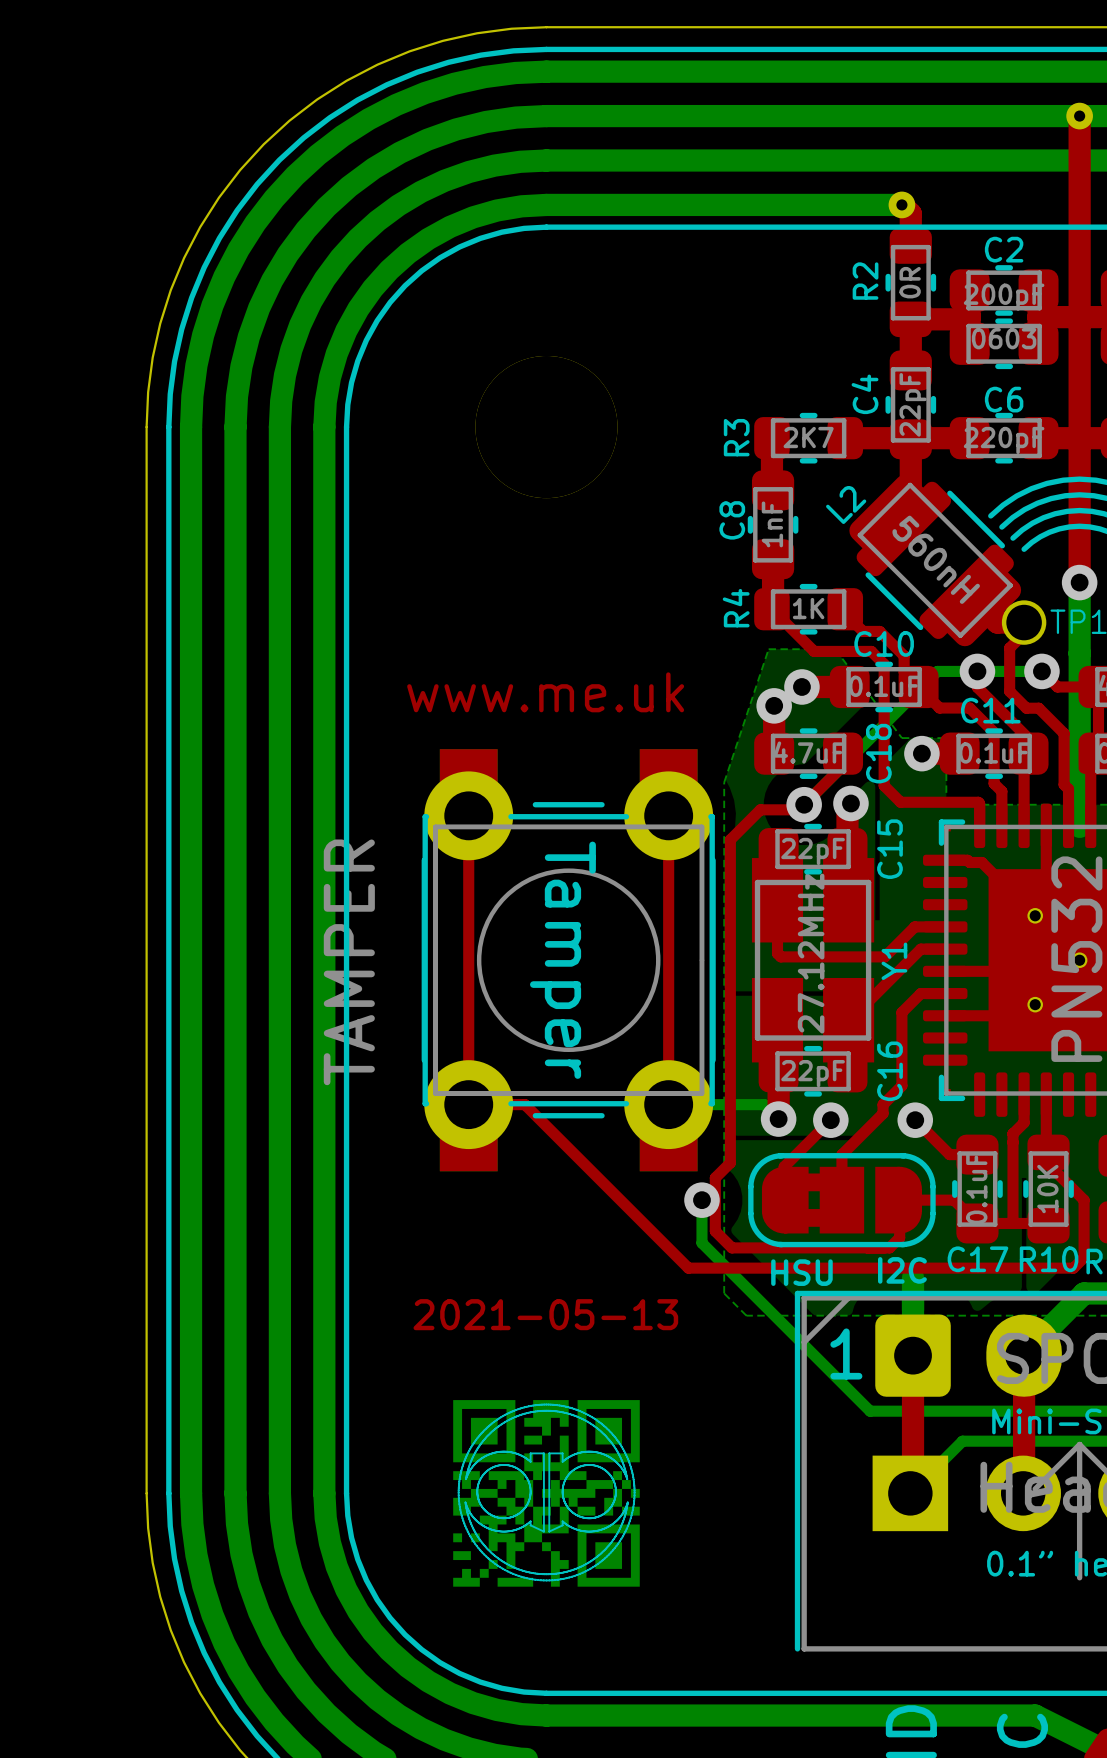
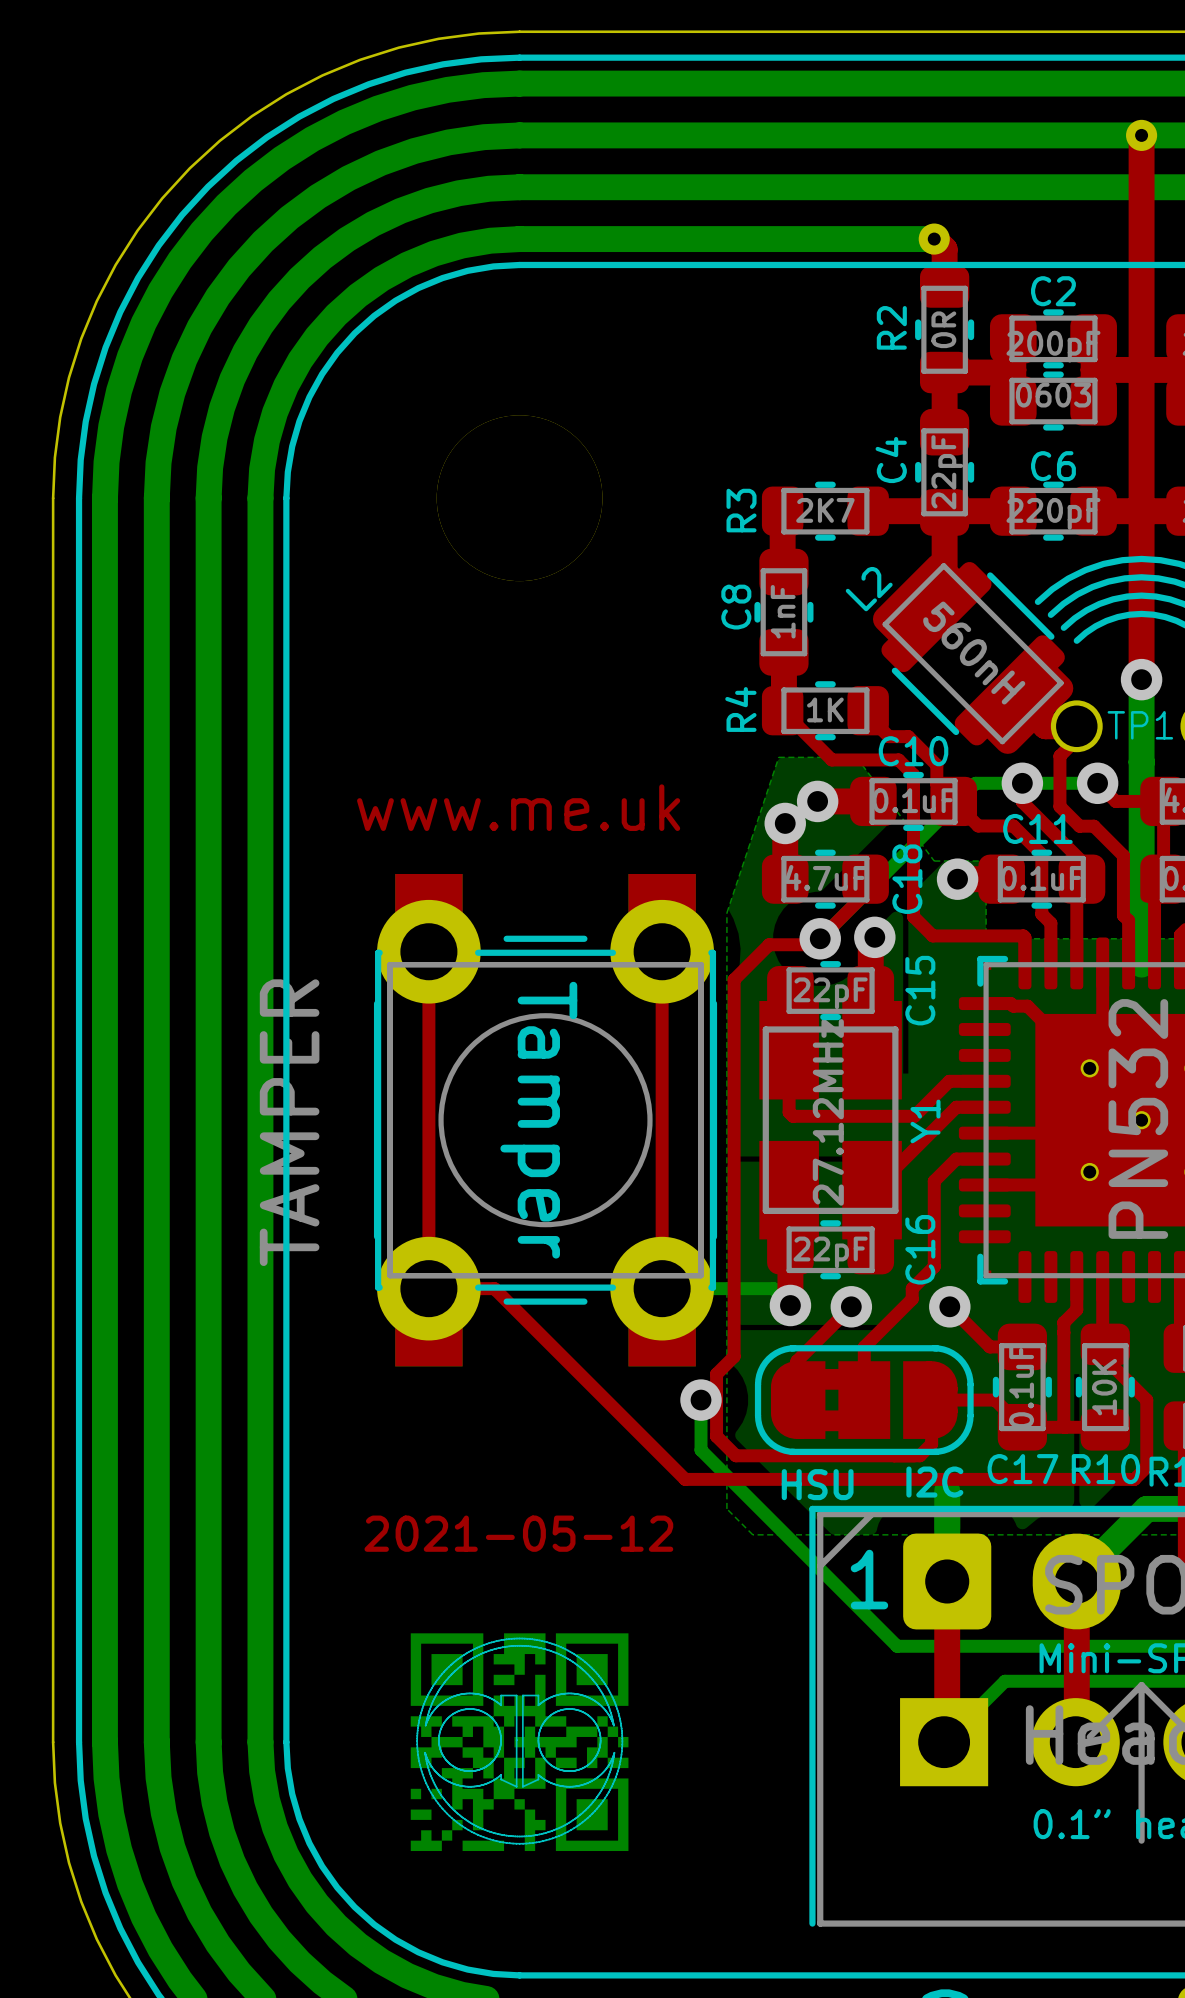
text: 2021-05-13 (545, 1314) -> 2021-05-12 (518, 1533)

